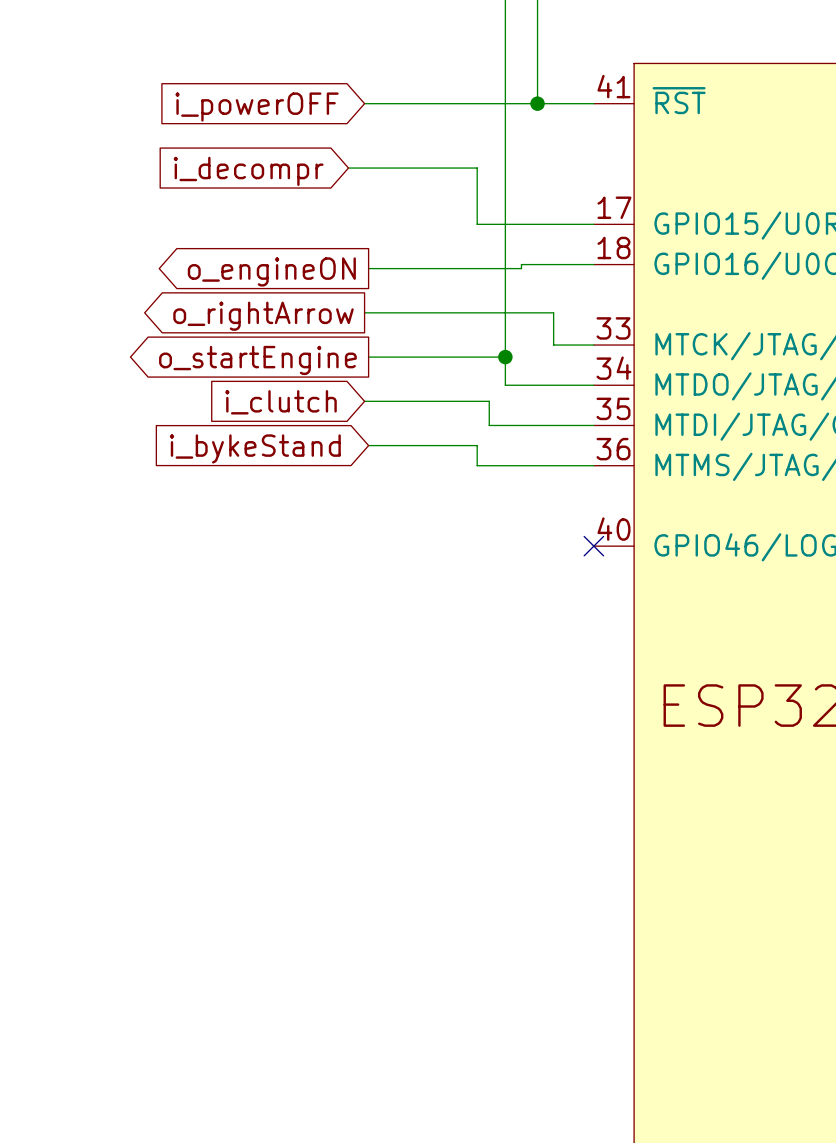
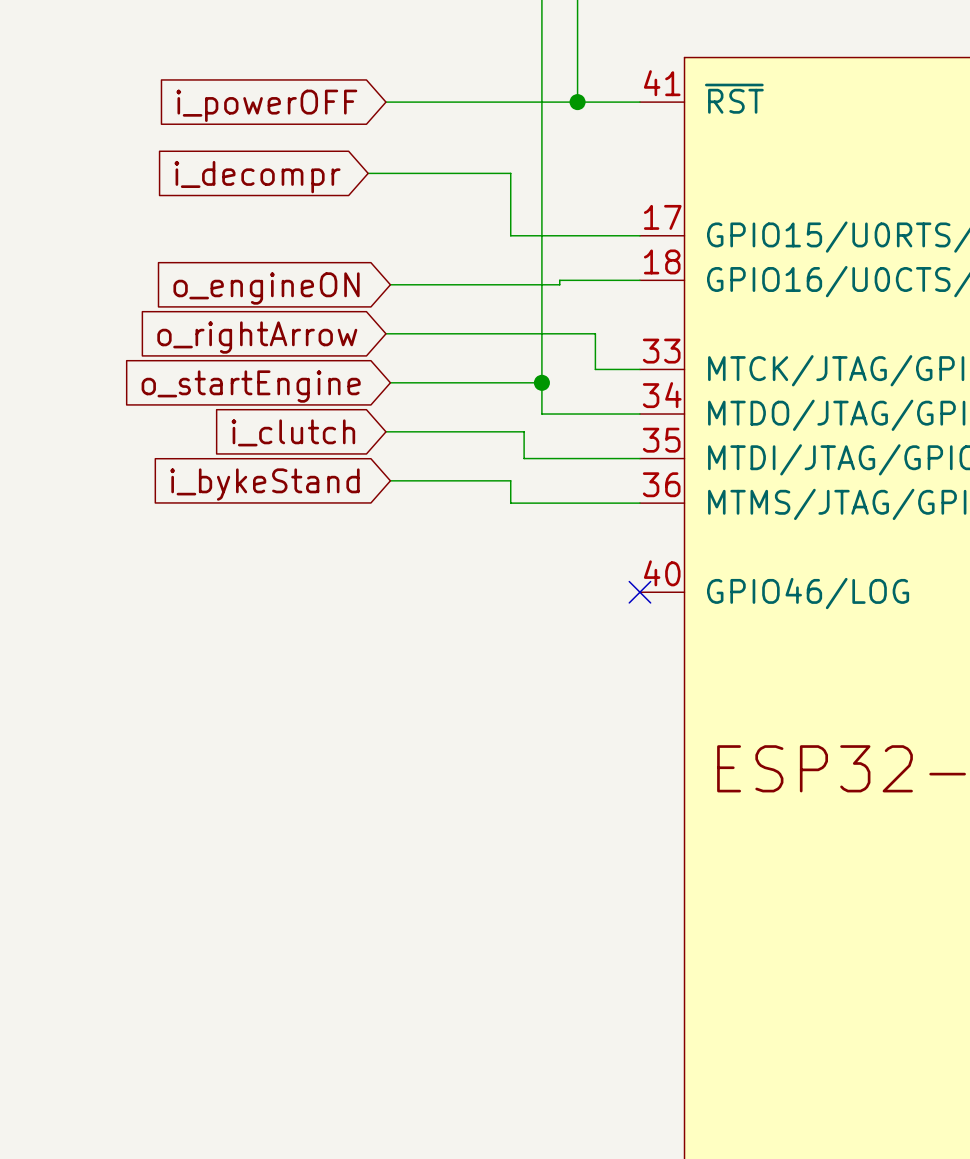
global label shape: output (271, 271) -> input (266, 288)
global label shape: output (263, 316) -> input (257, 337)
global label shape: output (257, 360) -> input (251, 386)

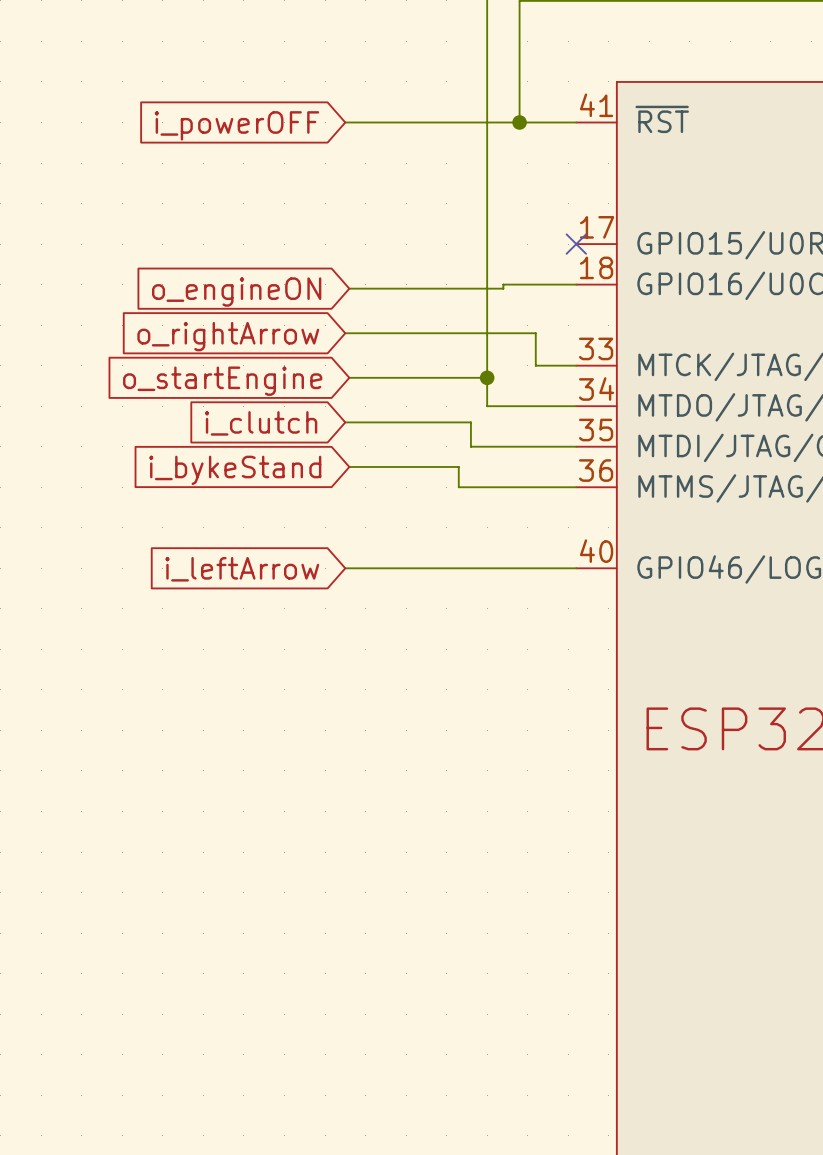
wire: (368, 173) (510, 173) (510, 235) (639, 235) -> none
global label: i_decompr (257, 177) -> none
no-connect mark: none -> (576, 244)
wire: none -> (345, 568) (576, 568)
no-connect mark: (639, 592) -> none
global label: none -> i_leftArrow (242, 569)

